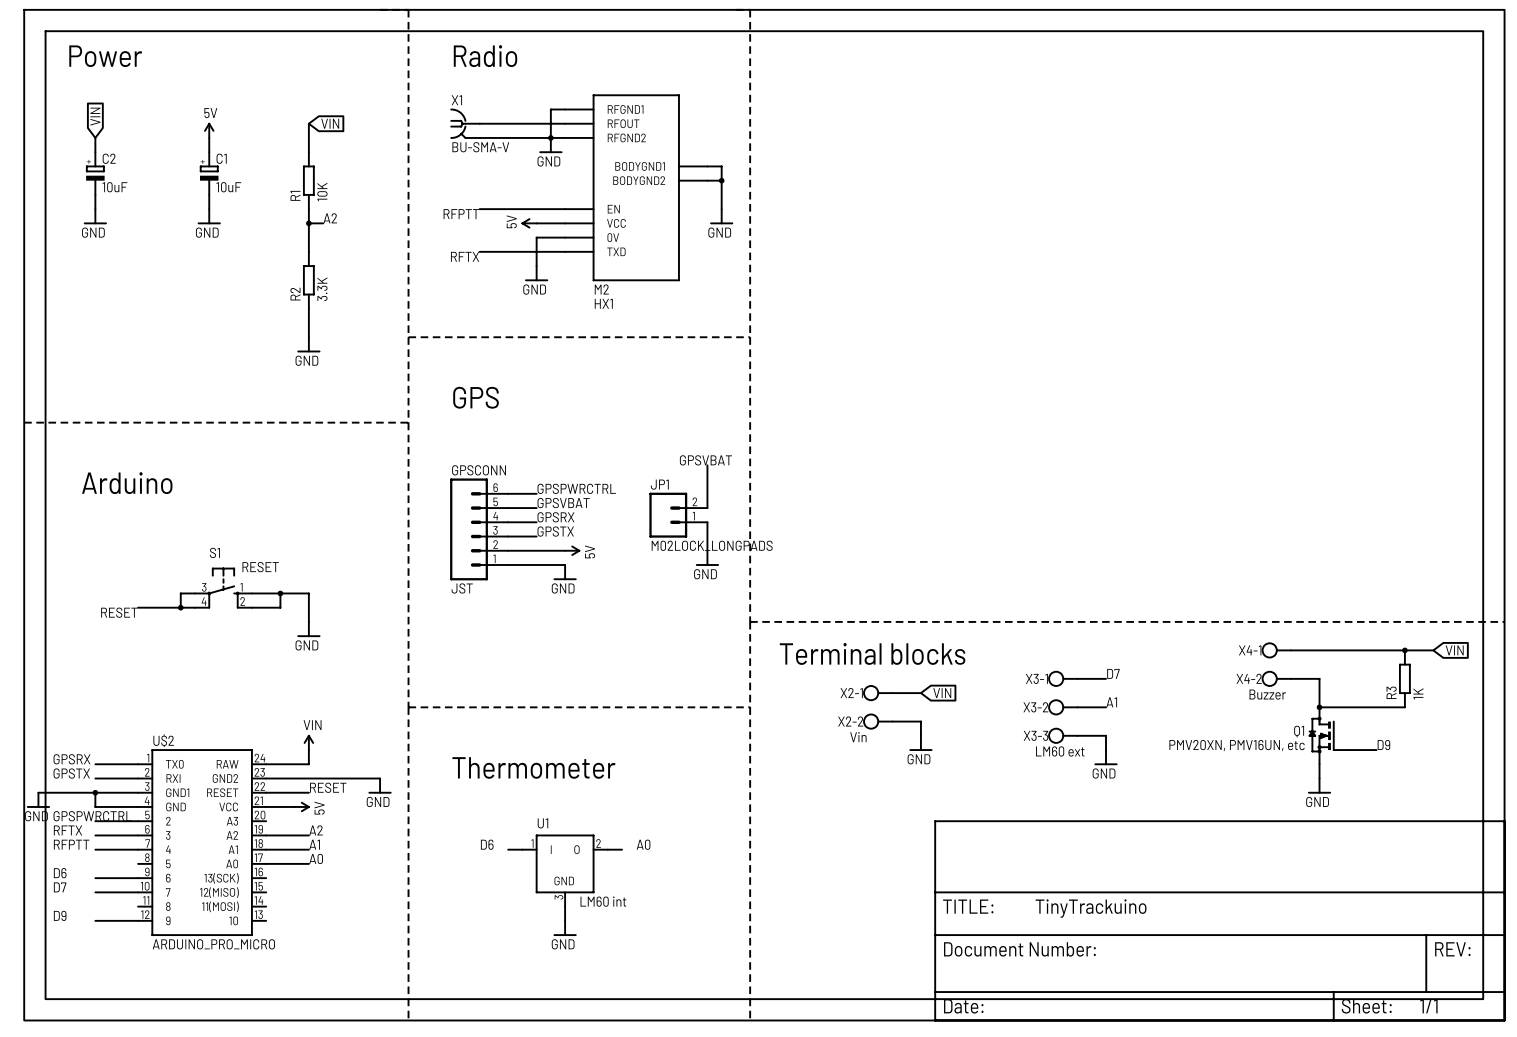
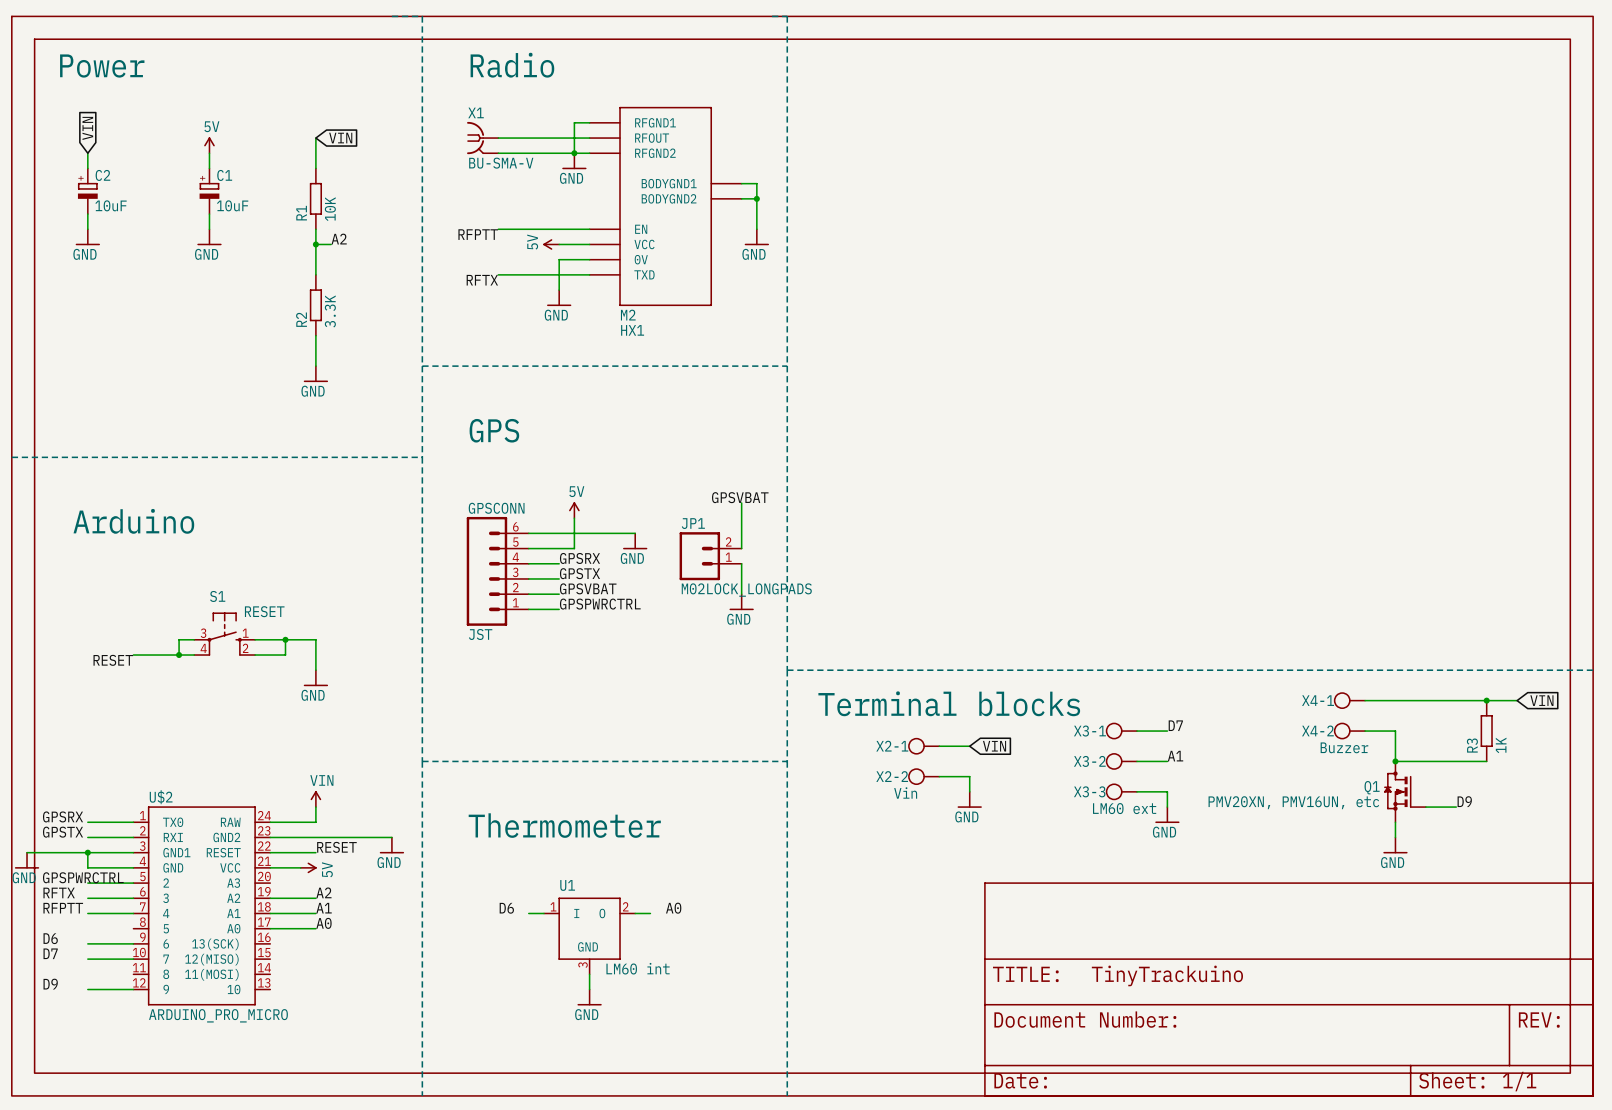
wire: none -> (574, 518) (574, 548) (559, 548)
label position: GPSPWRCTRL (576, 488) -> GPSPWRCTRL (600, 604)
wire: none -> (559, 533) (635, 533)
label position: GPSVBAT (563, 503) -> GPSVBAT (588, 588)
wire: (536, 550) (565, 550) -> none
power symbol position: 5V (572, 550) -> 5V (574, 510)
power symbol rotation: 0° (575, 550) -> 90° counterclockwise (574, 506)
wire: (536, 564) (565, 564) -> none
power symbol position: GND (565, 572) -> GND (635, 541)

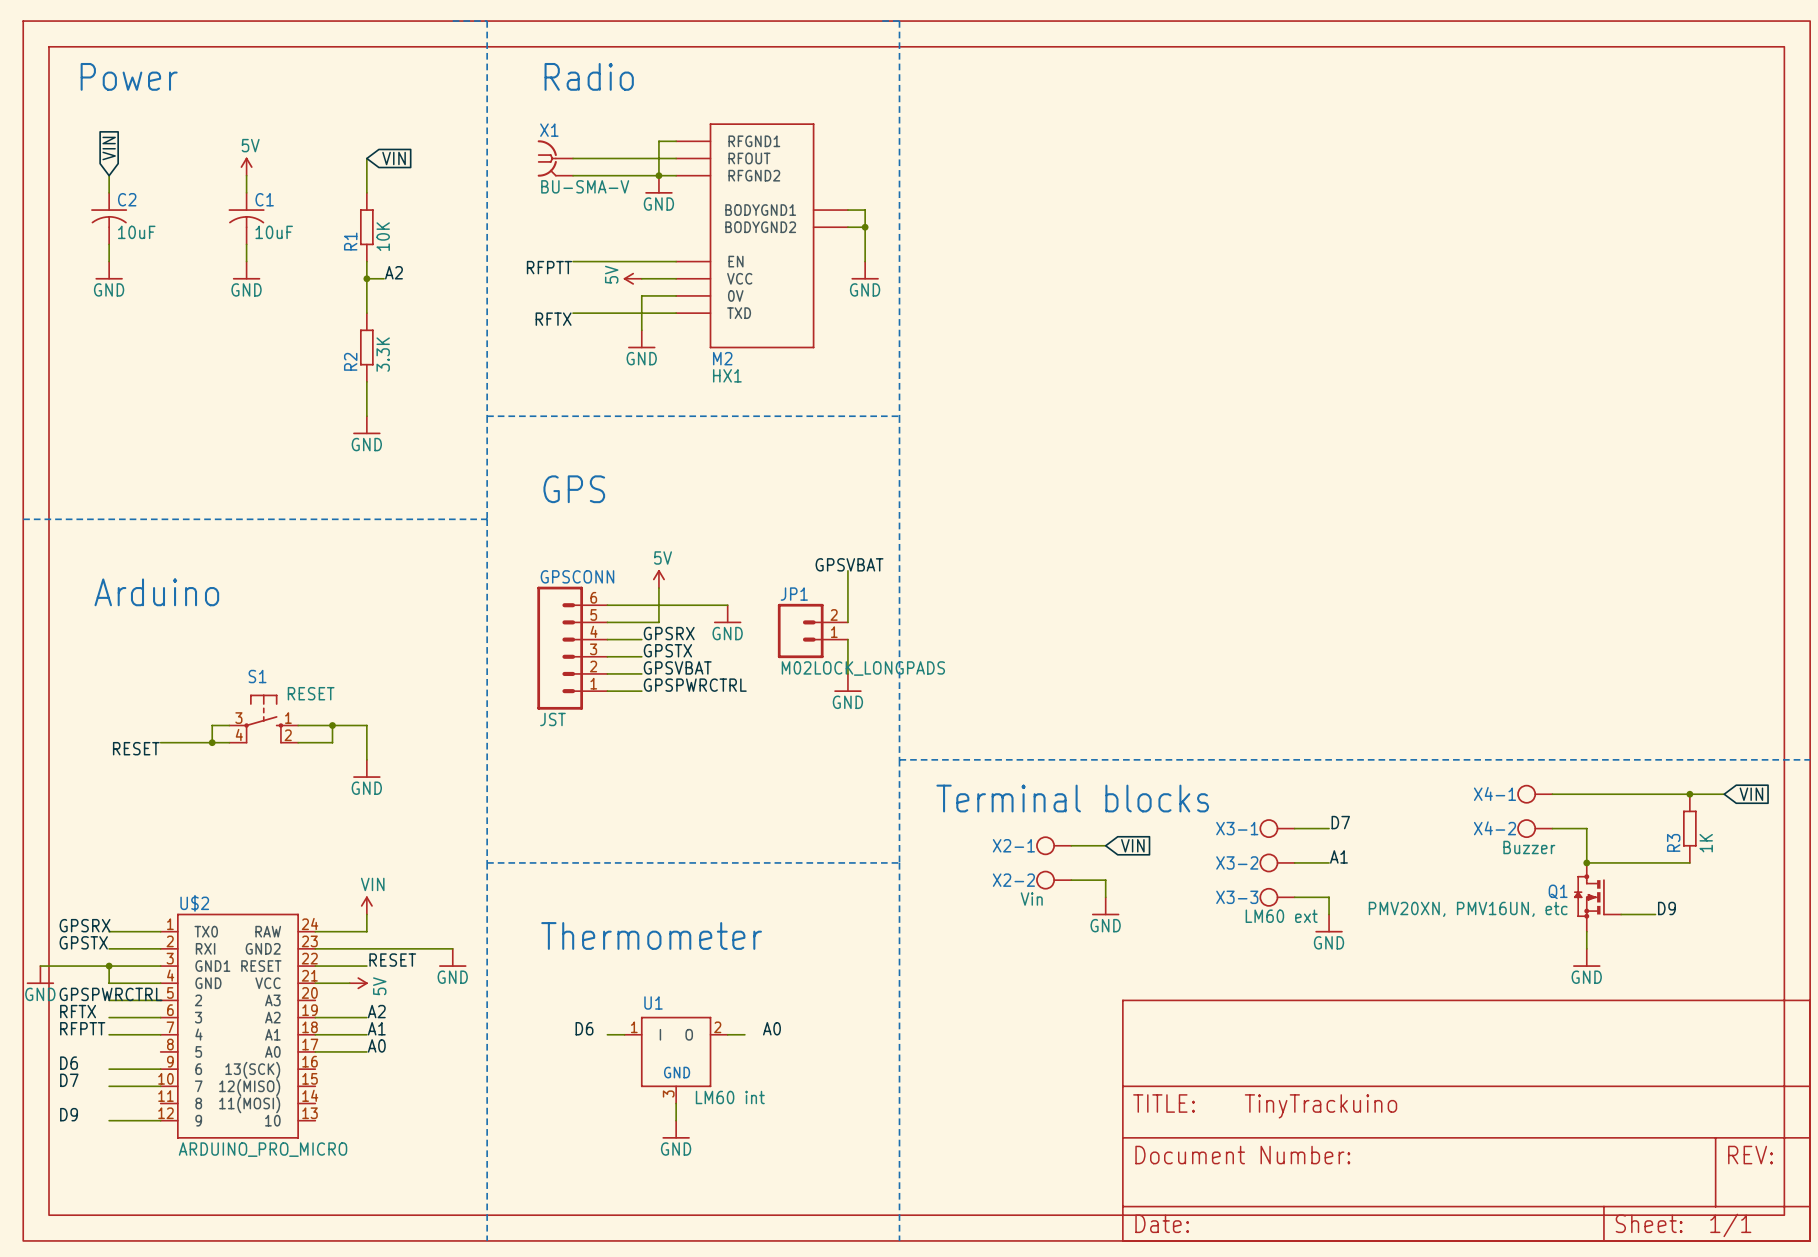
C2 symbol: [77, 168, 98, 215] -> [91, 192, 128, 245]
C1 symbol: [199, 168, 220, 215] -> [228, 192, 265, 245]

